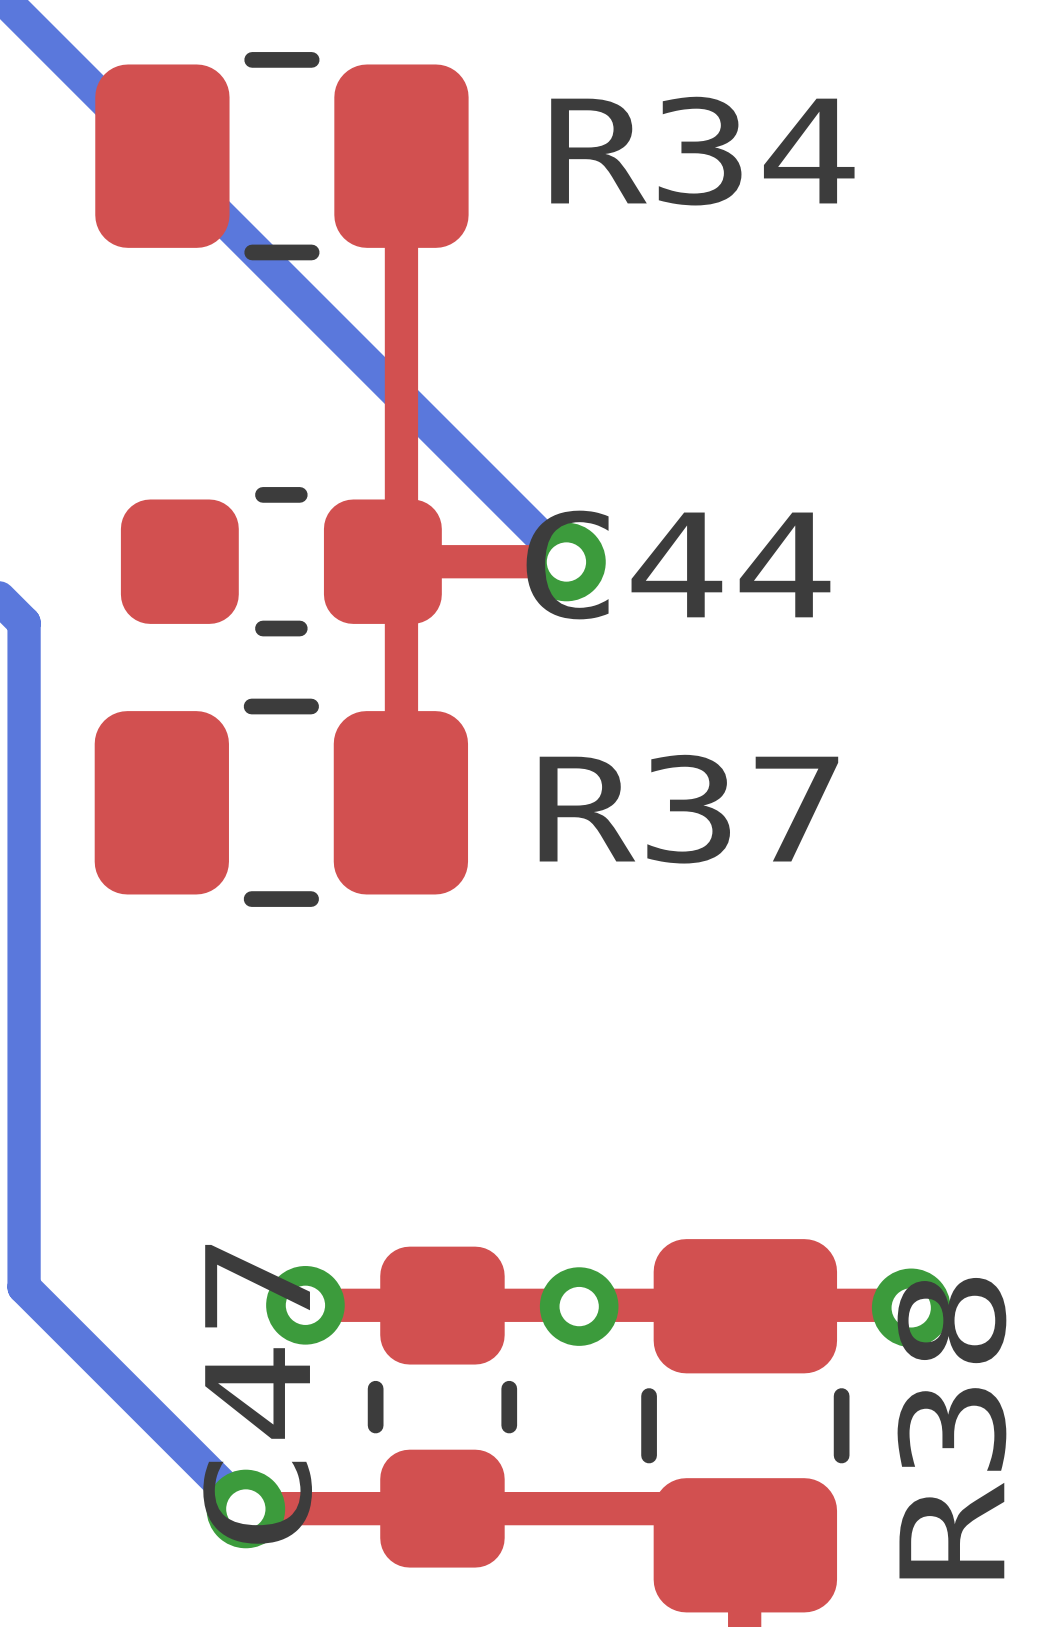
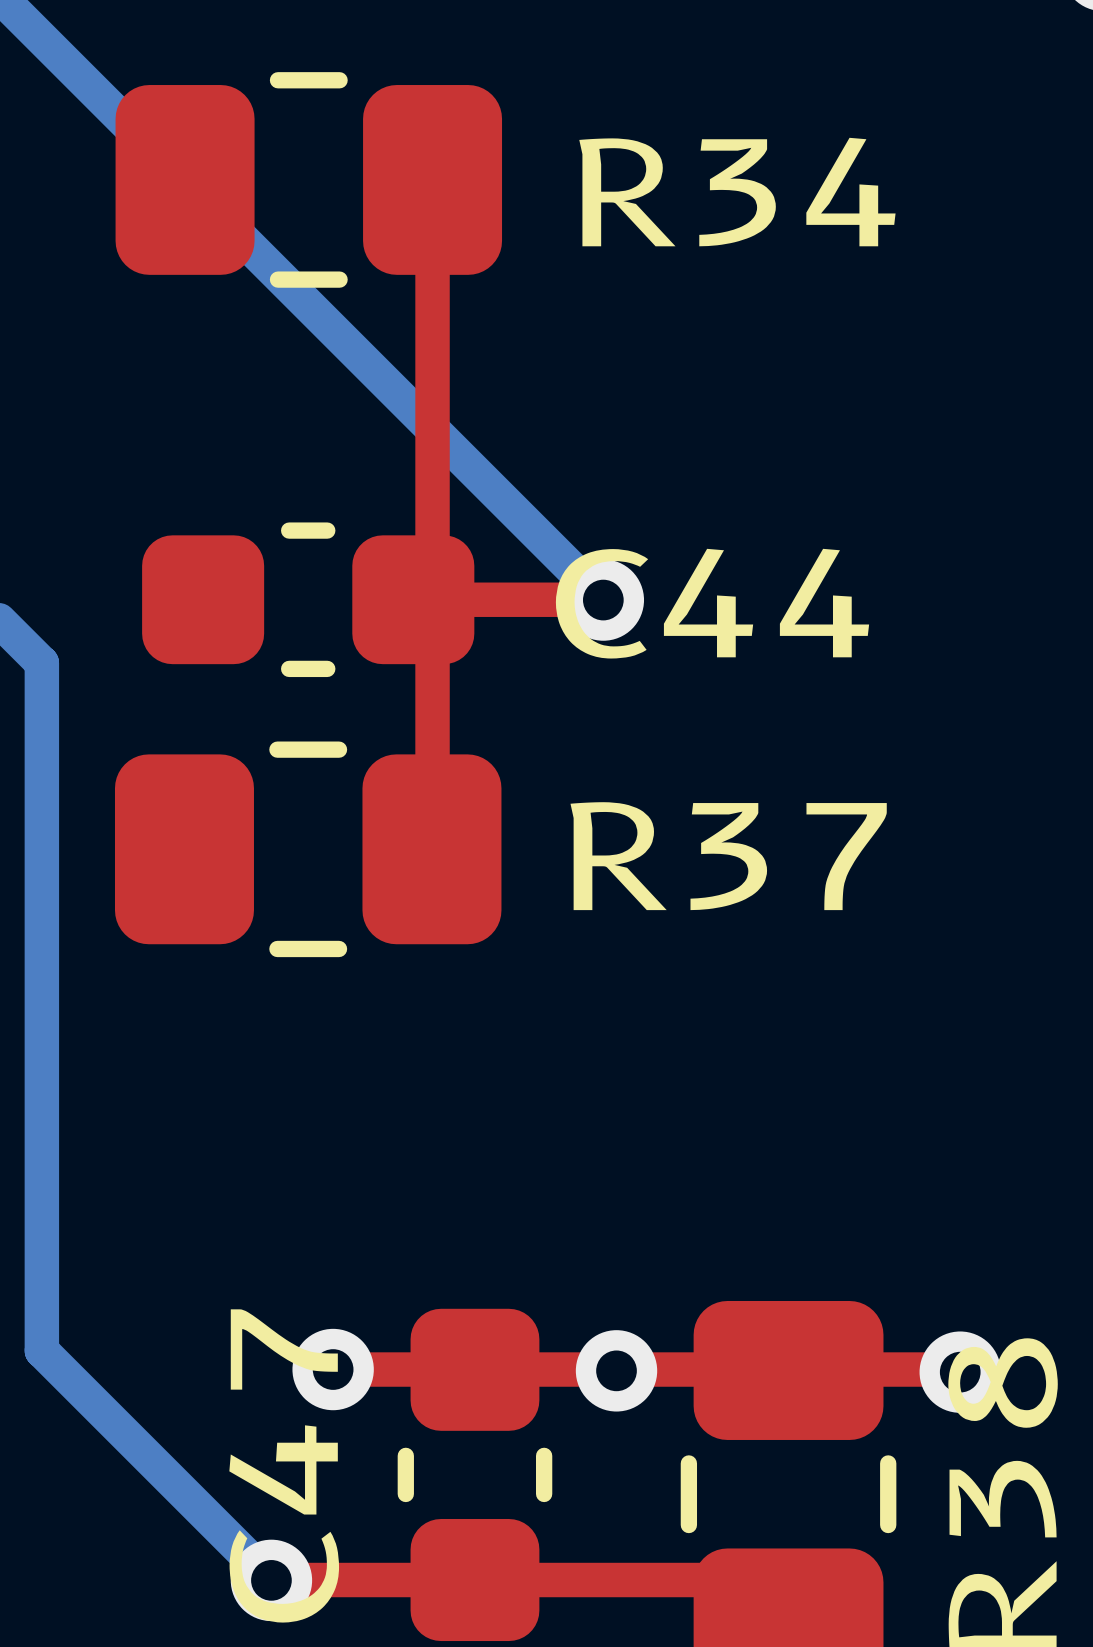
R34 name position: R34 (702, 151) -> R34 (737, 192)

